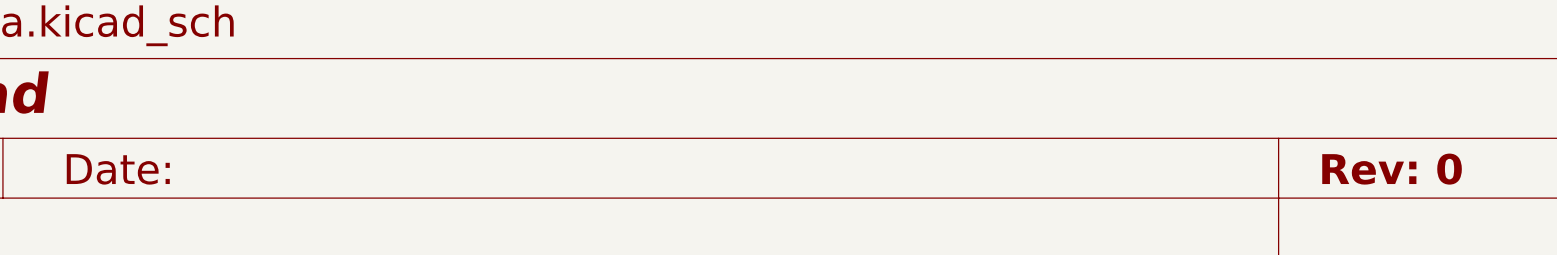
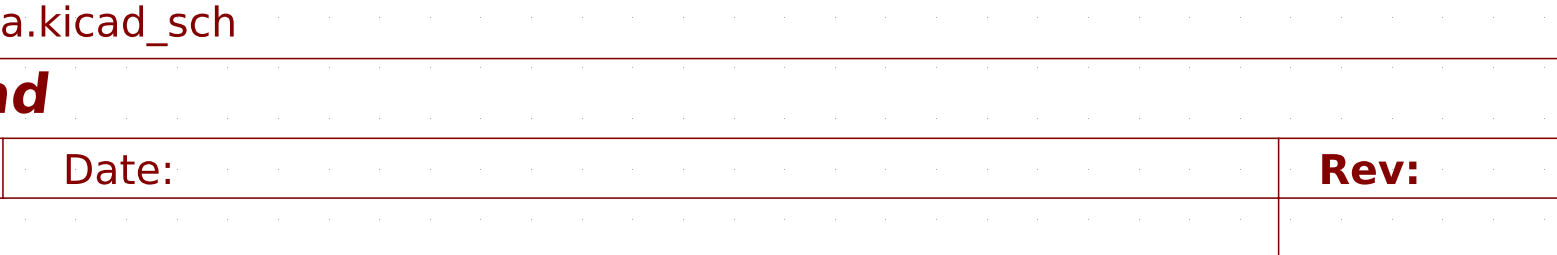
title block: Rev: 0 (1392, 169) -> Rev: (1369, 169)

